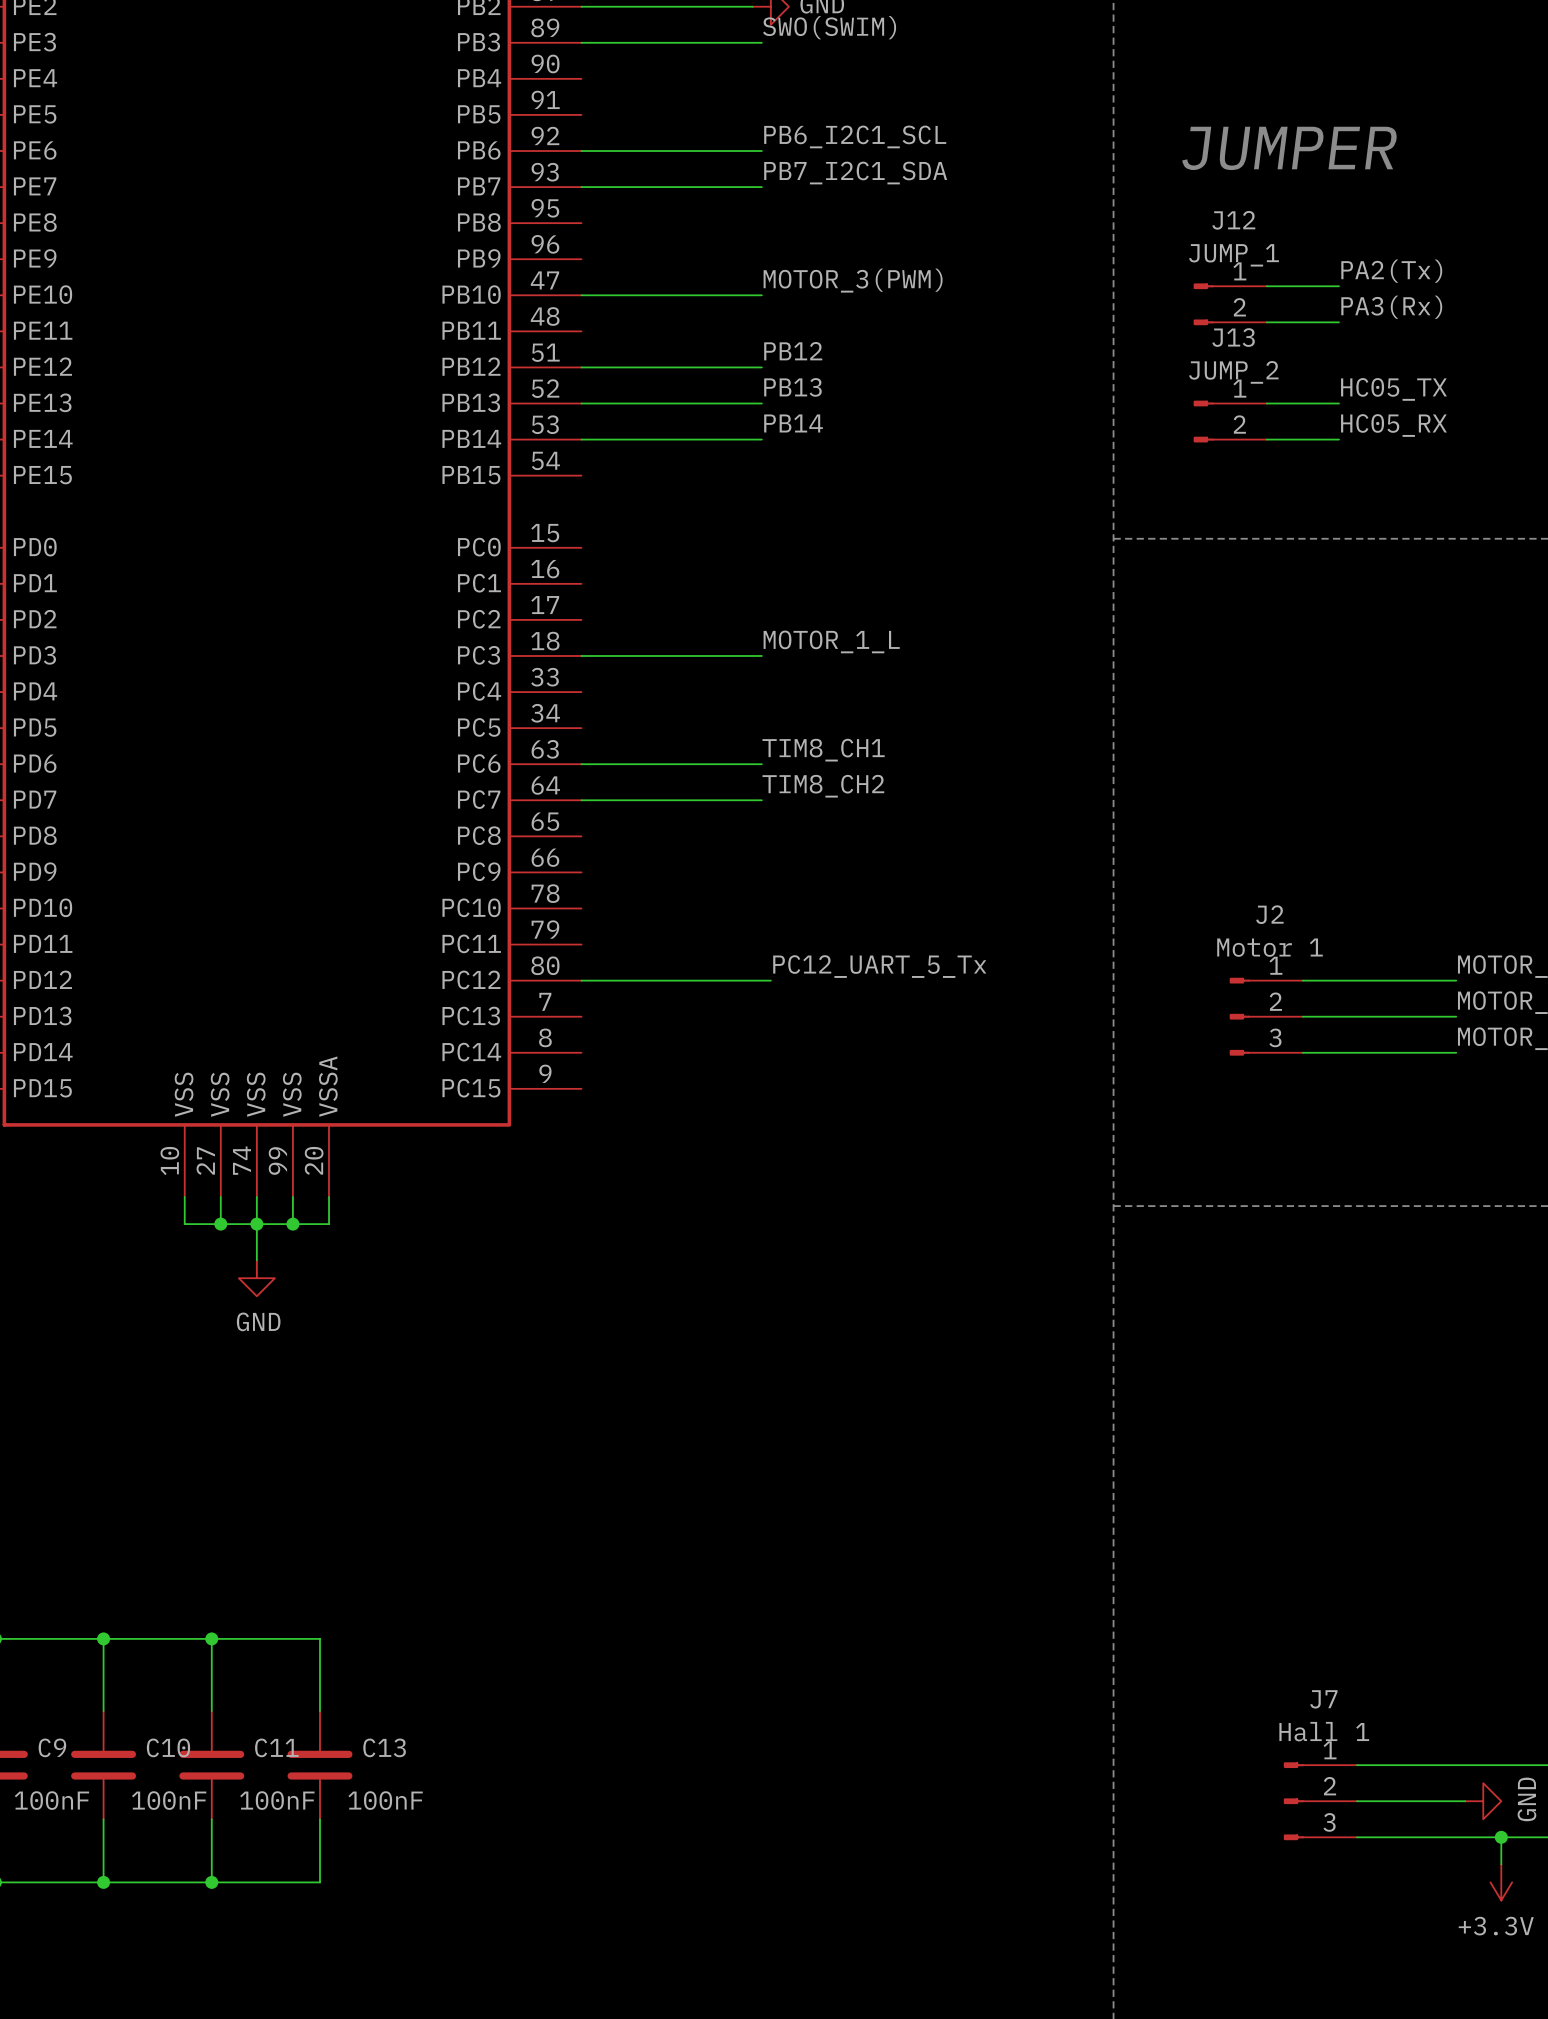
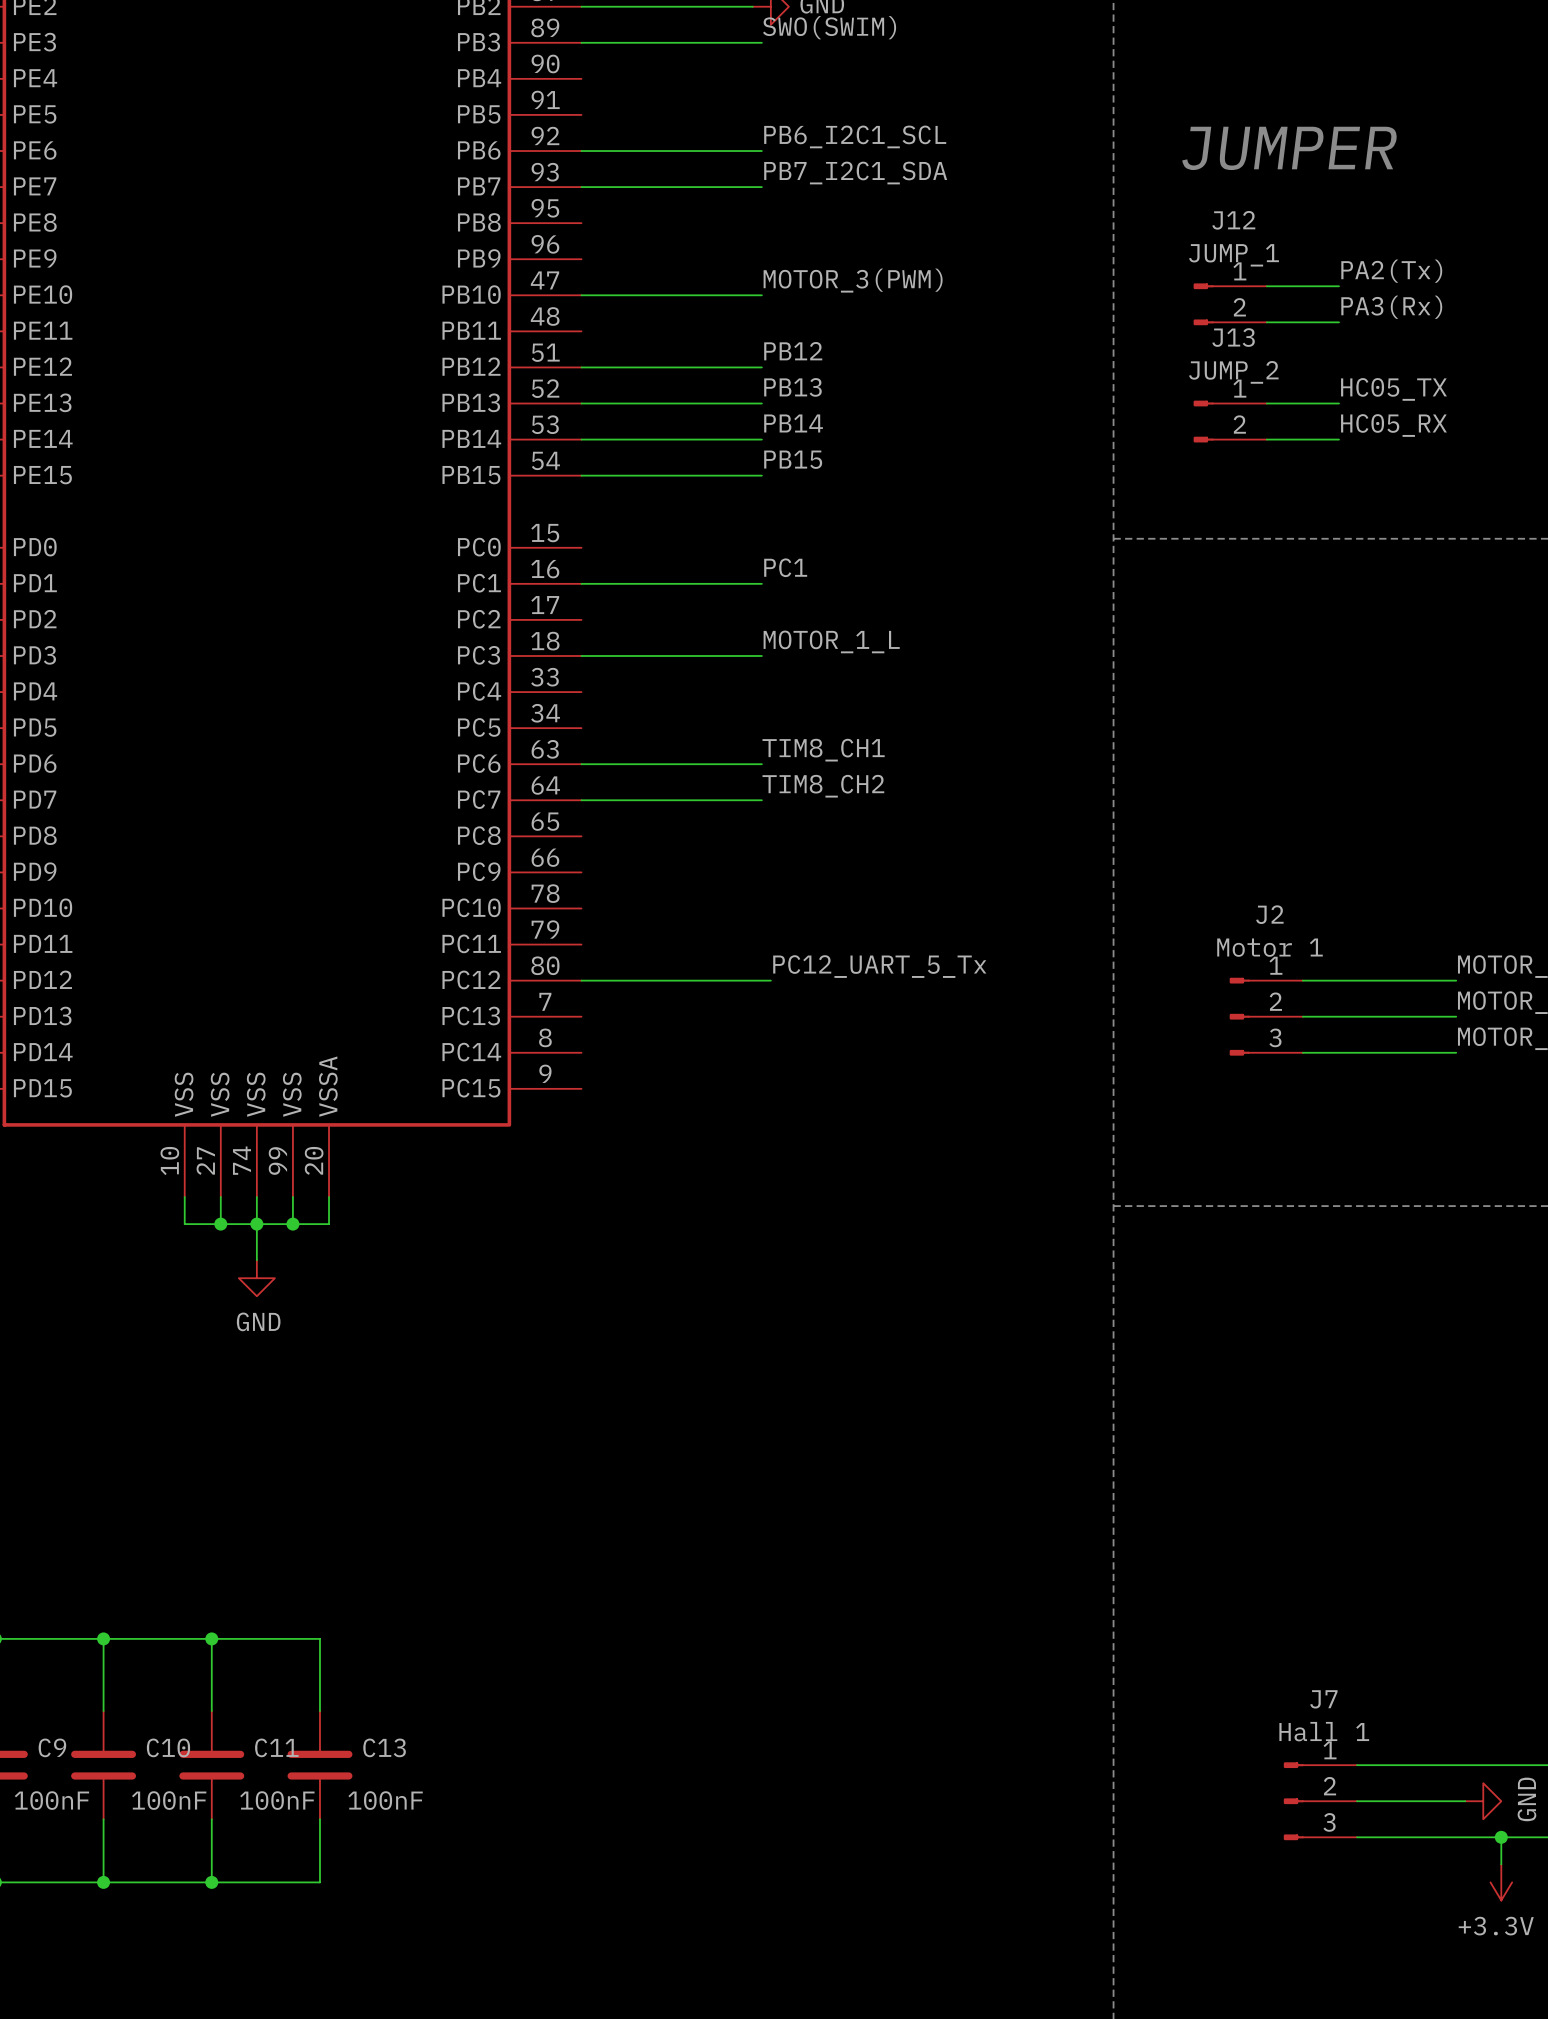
label: none -> PB15 (793, 459)
wire: none -> (581, 475) (761, 475)
label: none -> PC1 (785, 567)
wire: none -> (581, 583) (761, 583)

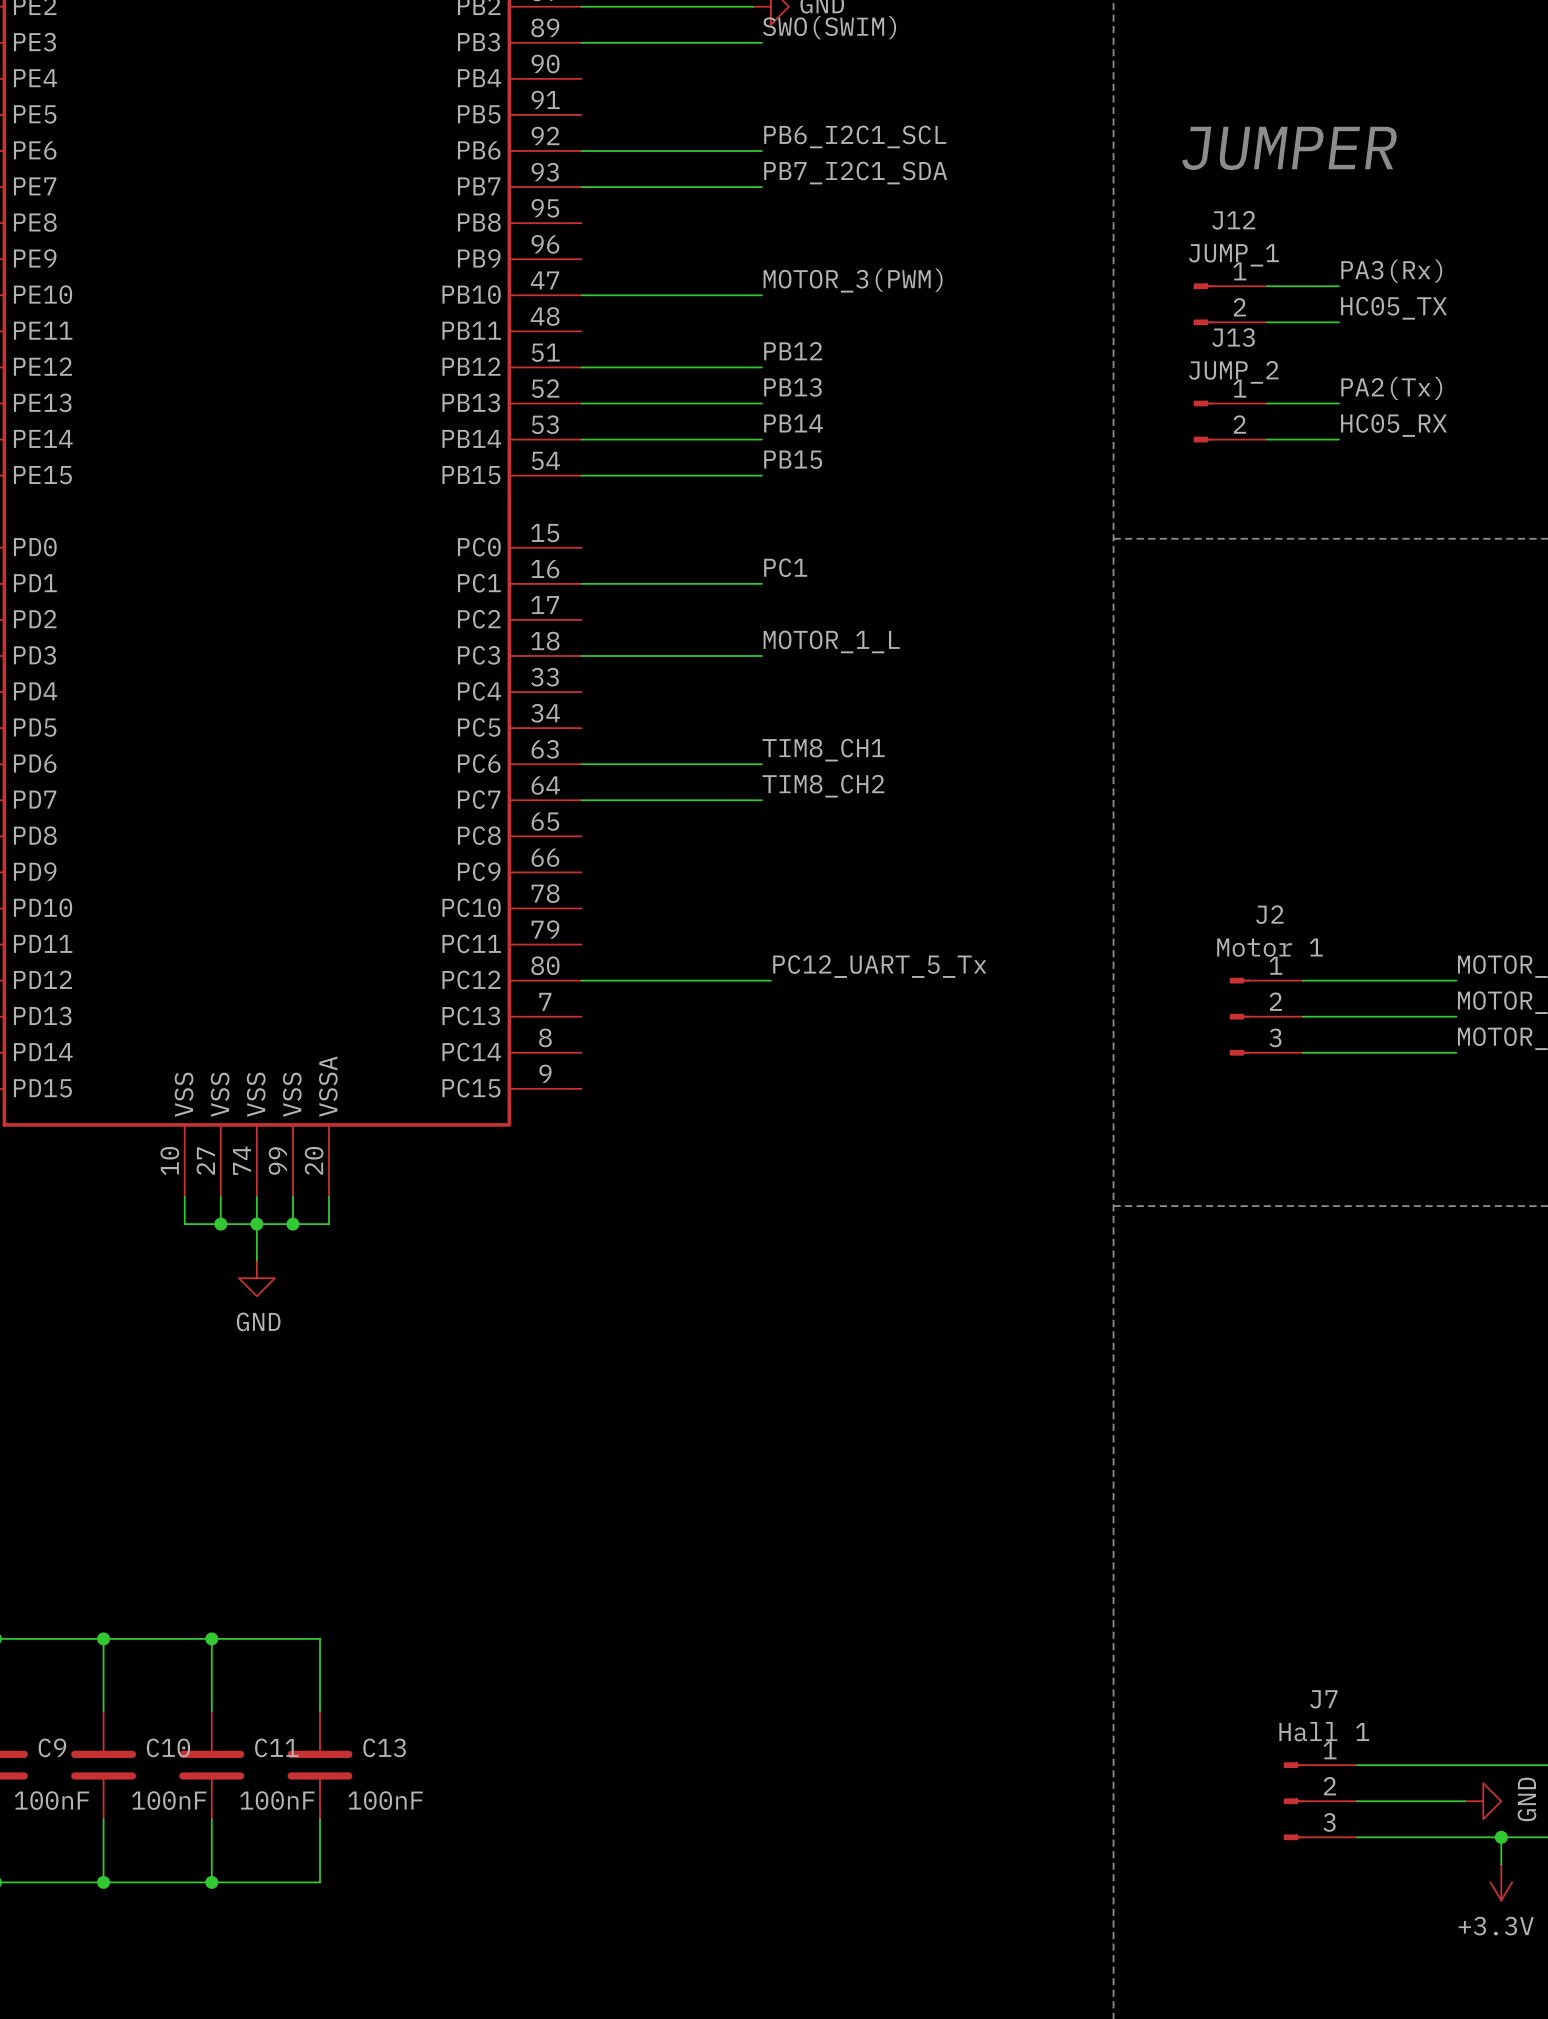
label: PA2(Tx) (1391, 271) -> PA3(Rx) (1391, 271)
label: PA3(Rx) (1391, 307) -> HC05_TX (1393, 308)
label: HC05_TX (1393, 389) -> PA2(Tx) (1391, 388)

